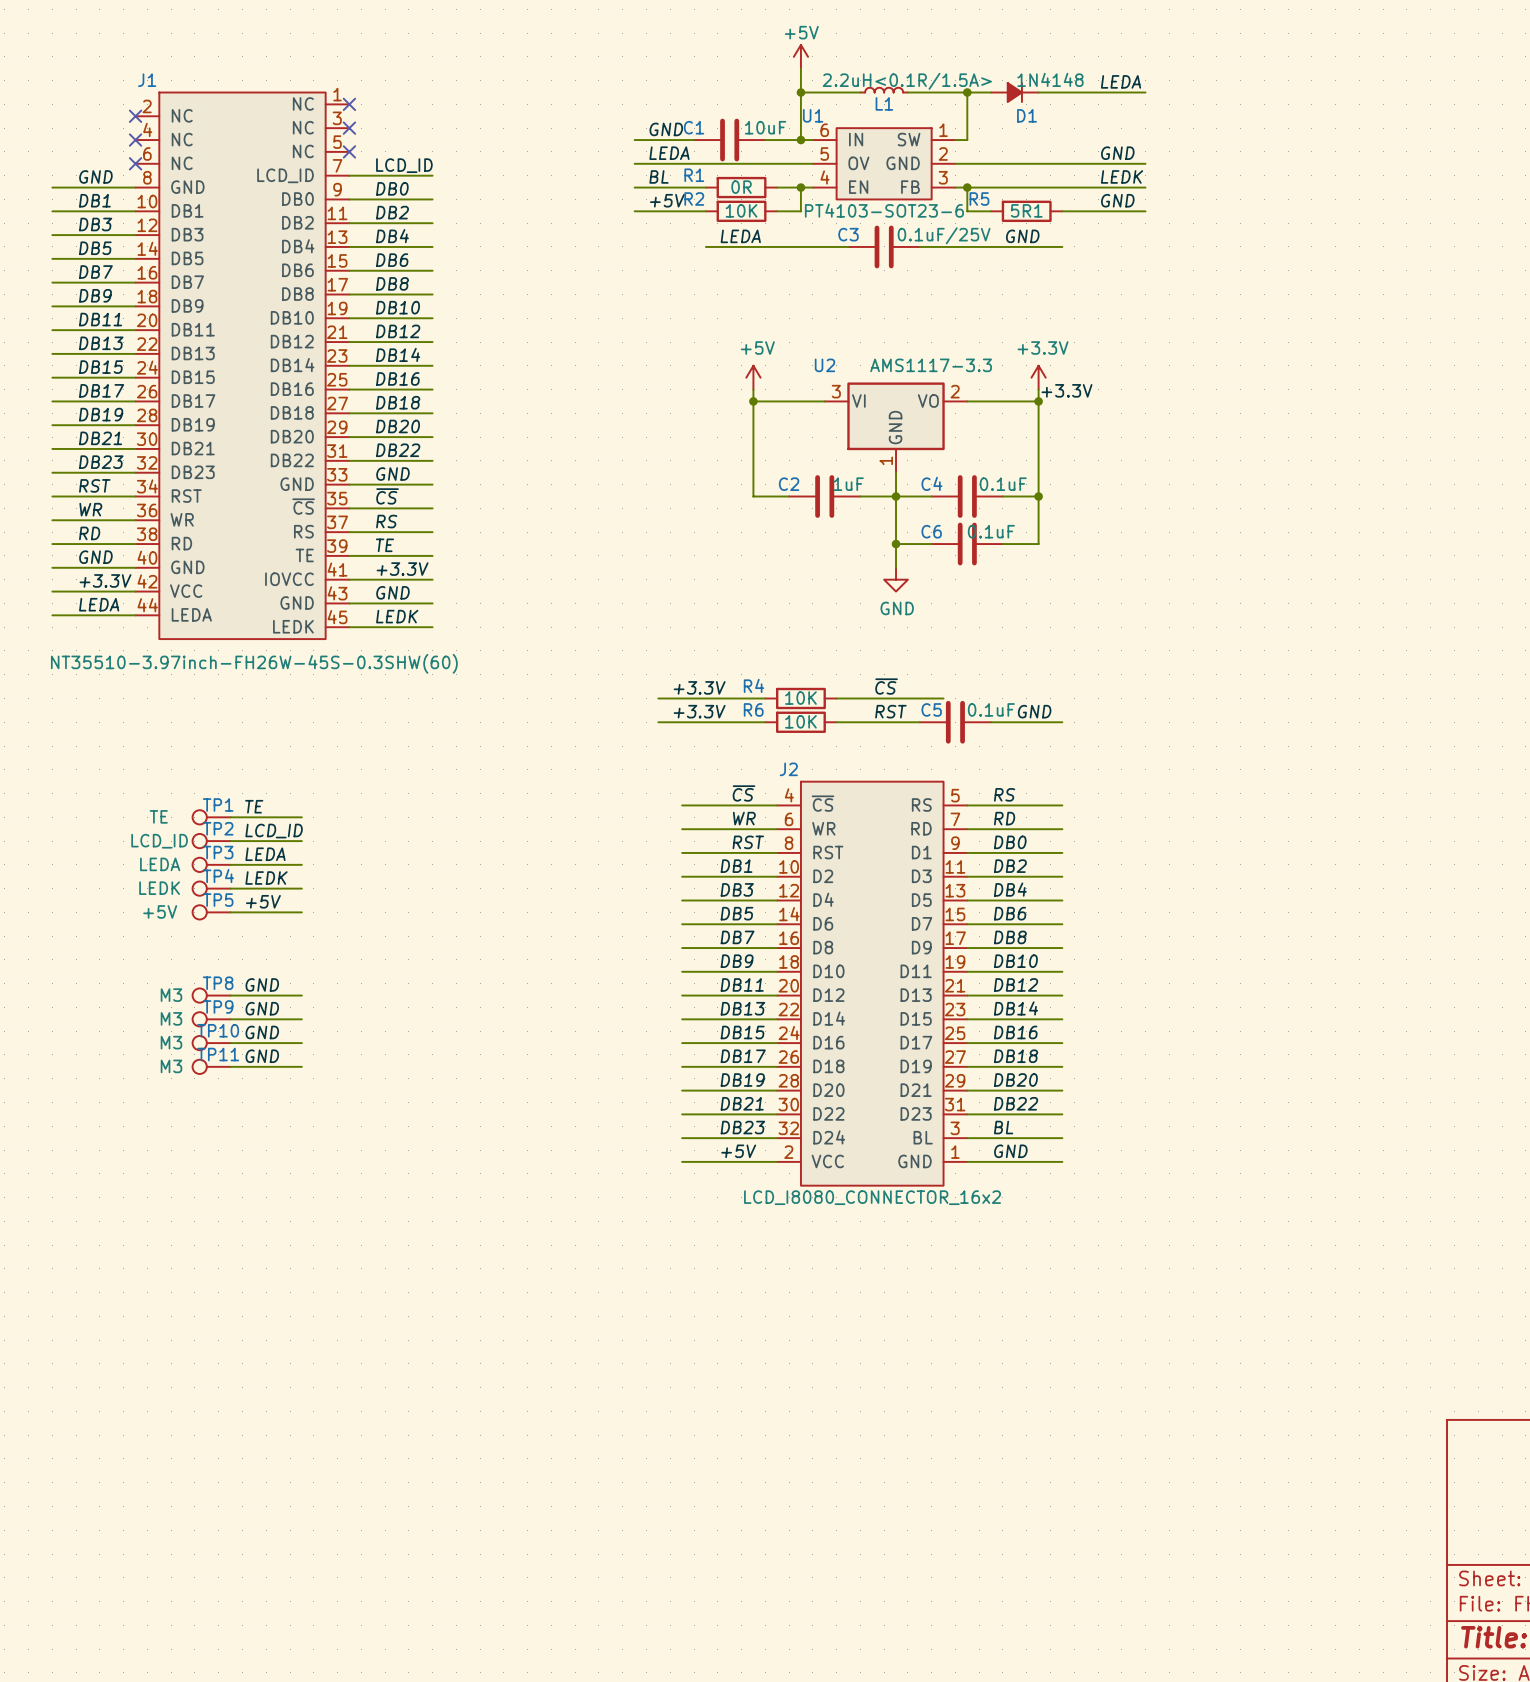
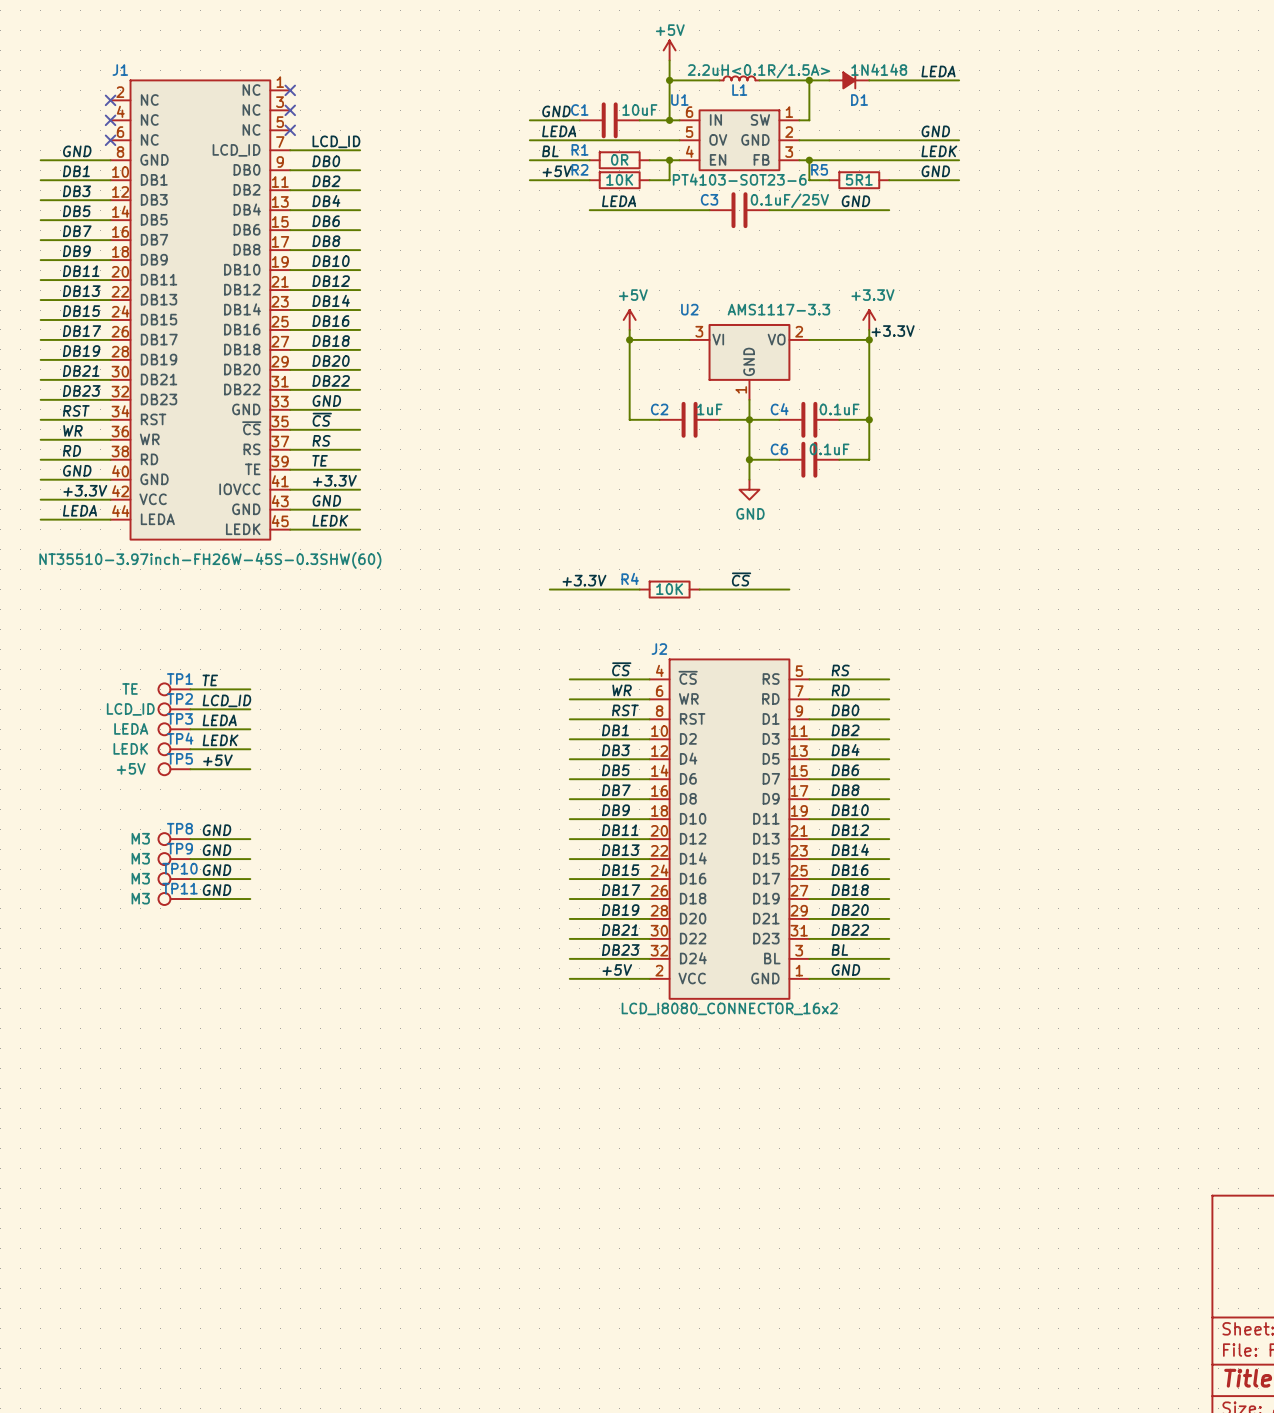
label: +3.3V (699, 711) -> none
label: RST (890, 711) -> none
label: GND (1034, 711) -> none
wire: (658, 722) (765, 722) -> none
R6: 10K (800, 722) -> none
wire: (836, 722) (919, 722) -> none
C5: 0.1uF (955, 722) -> none
wire: (991, 722) (1062, 722) -> none

